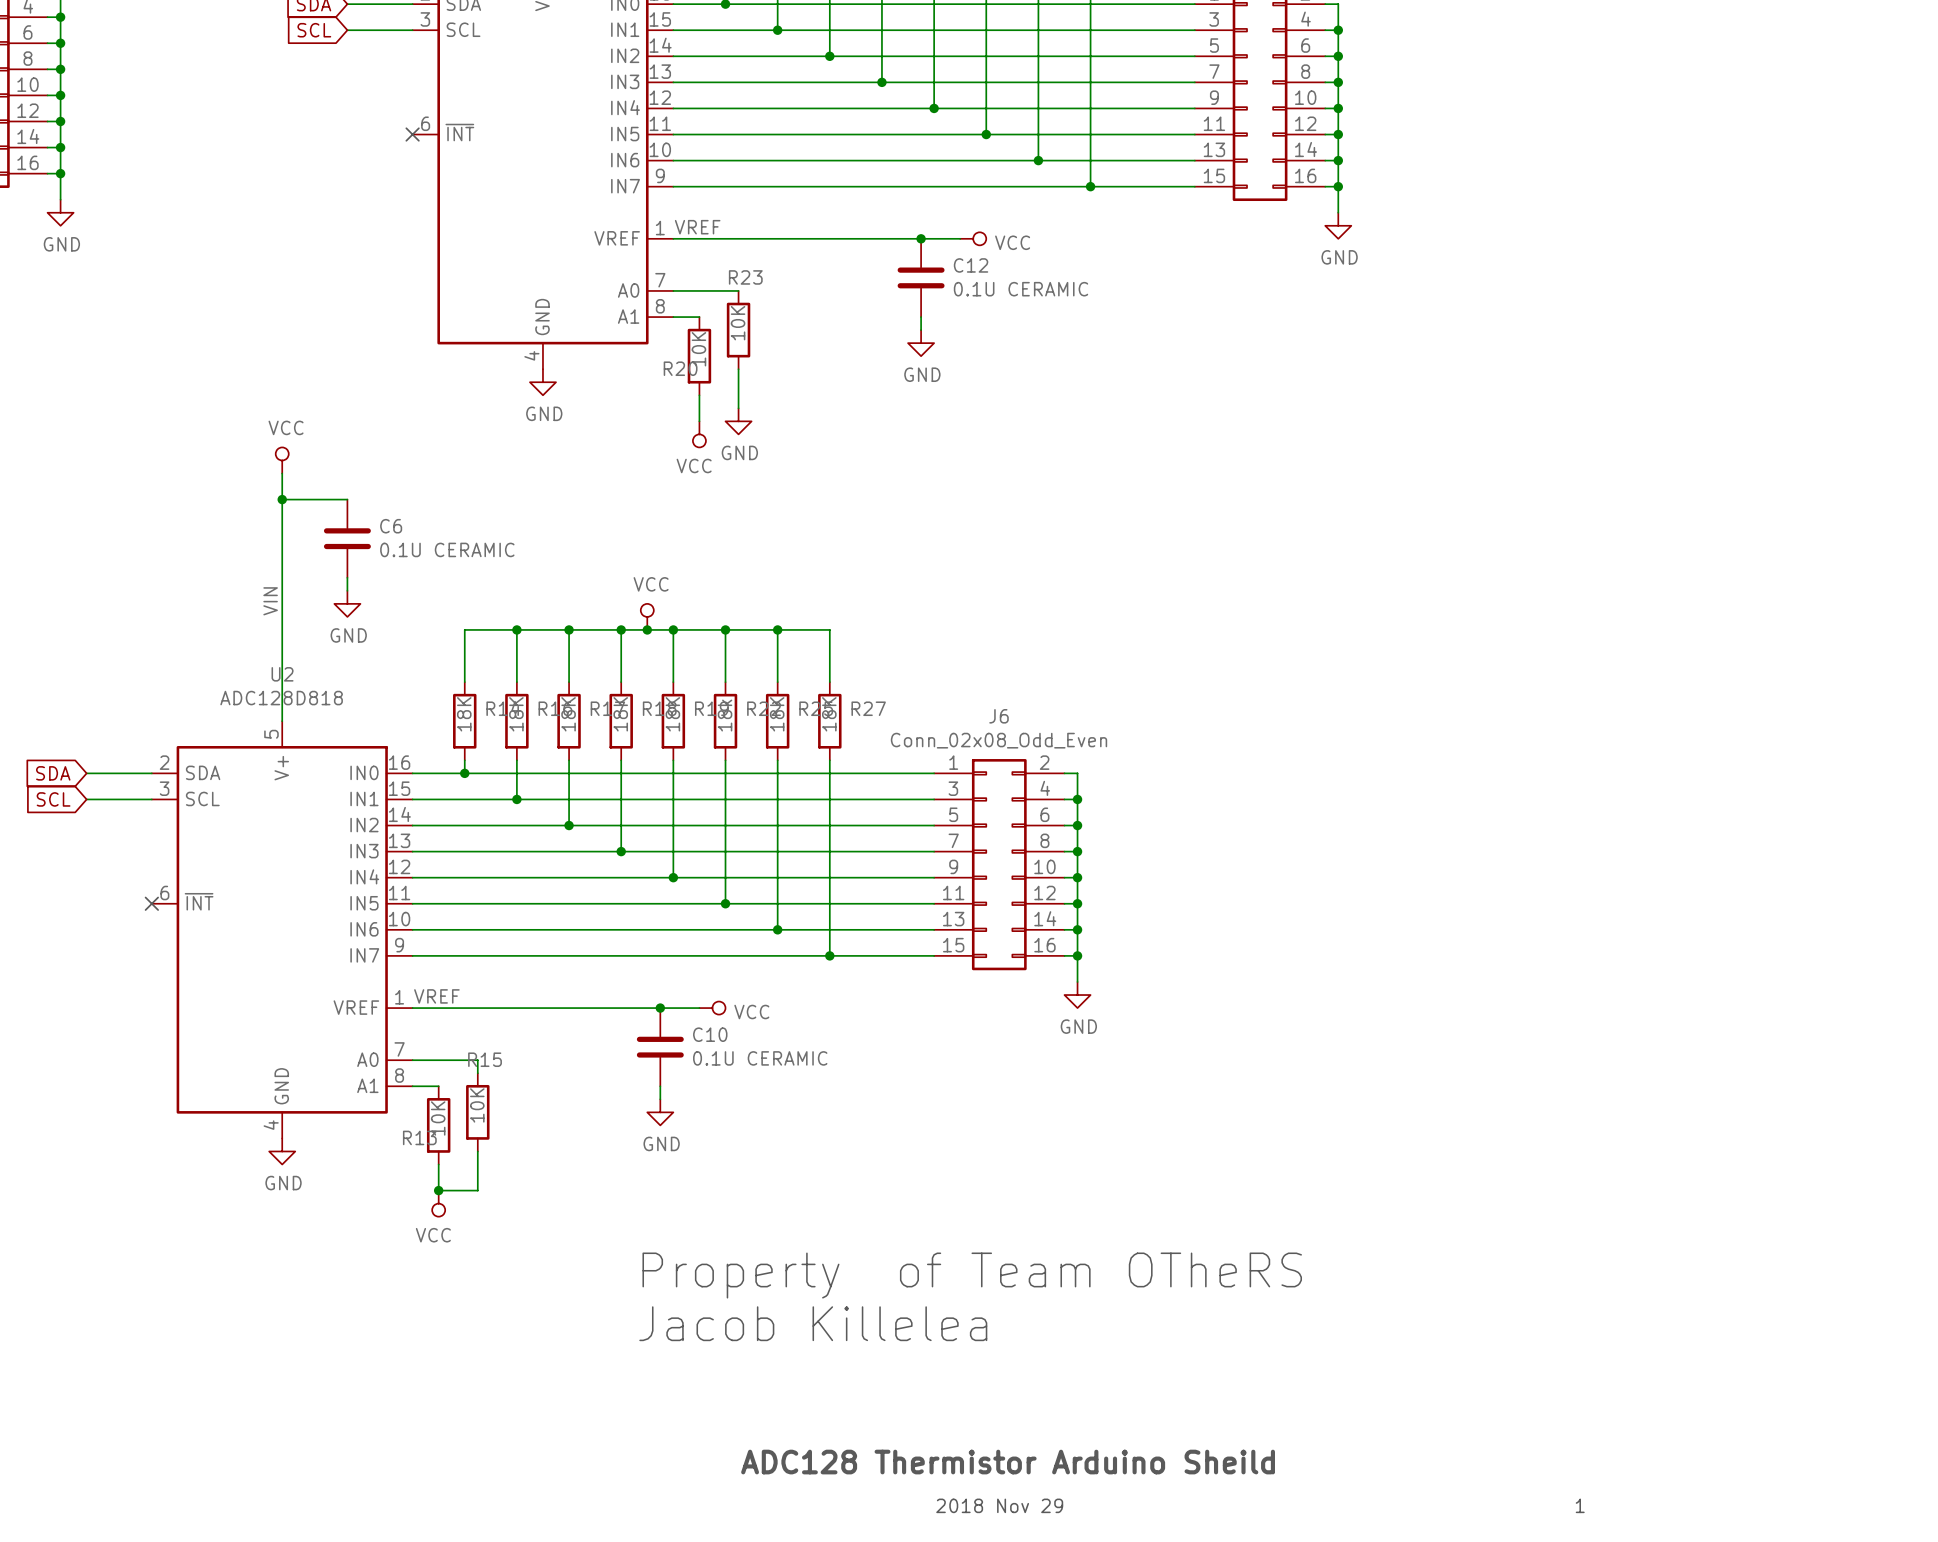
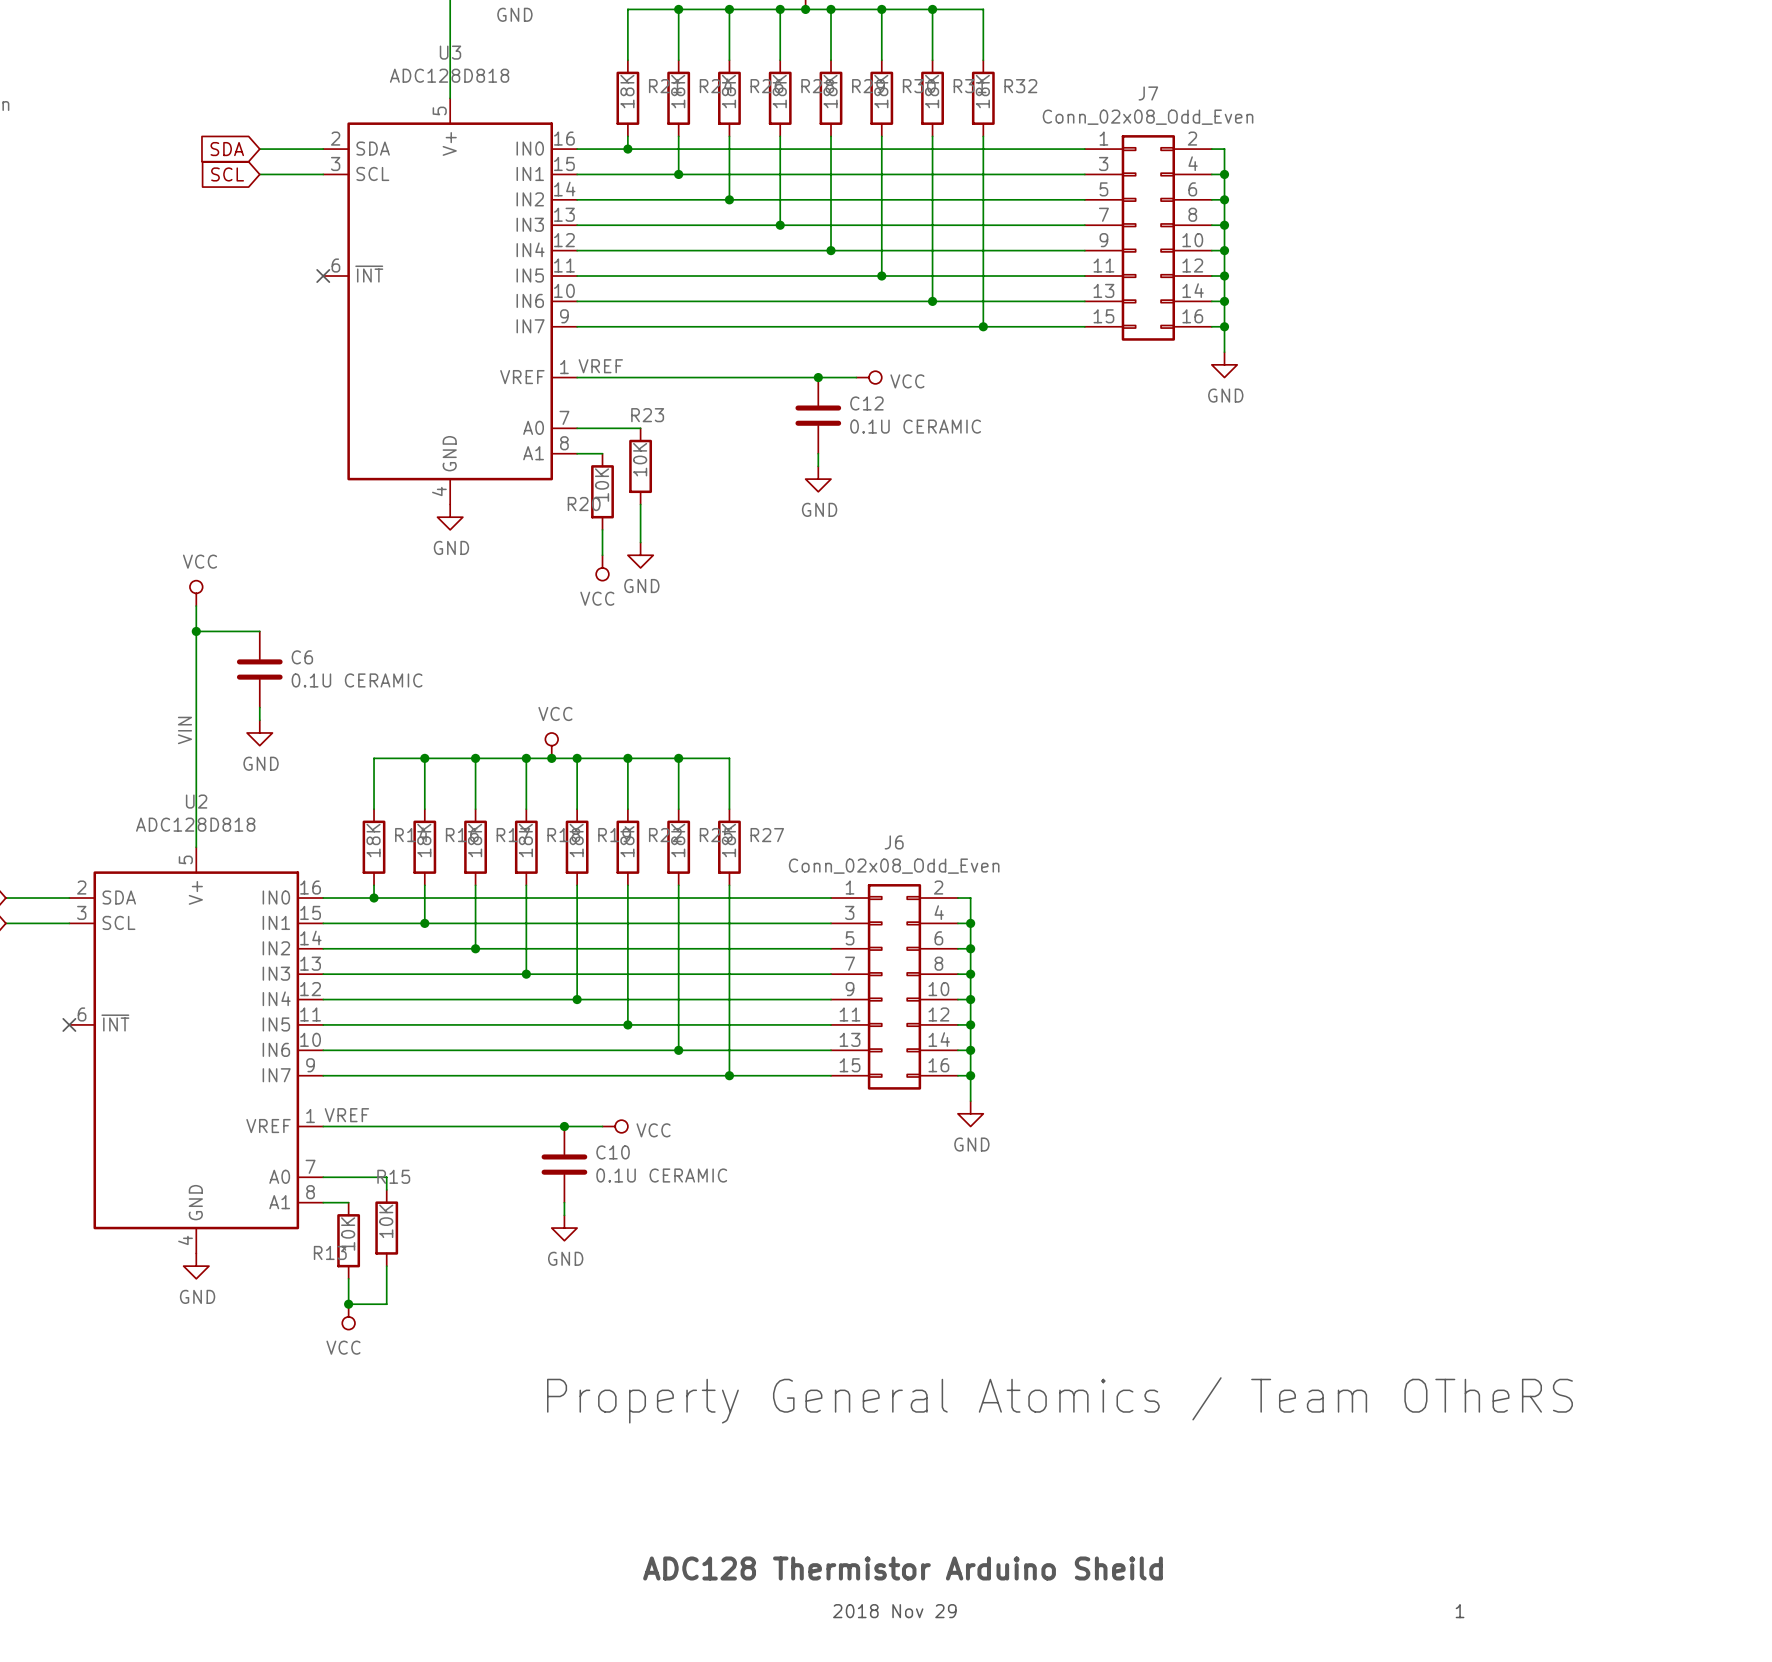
text: Property of Team OTheRS (972, 1275) -> Property General Atomics / Team OTheRS (1059, 1400)
text: Jacob Killelea (813, 1323) -> none

